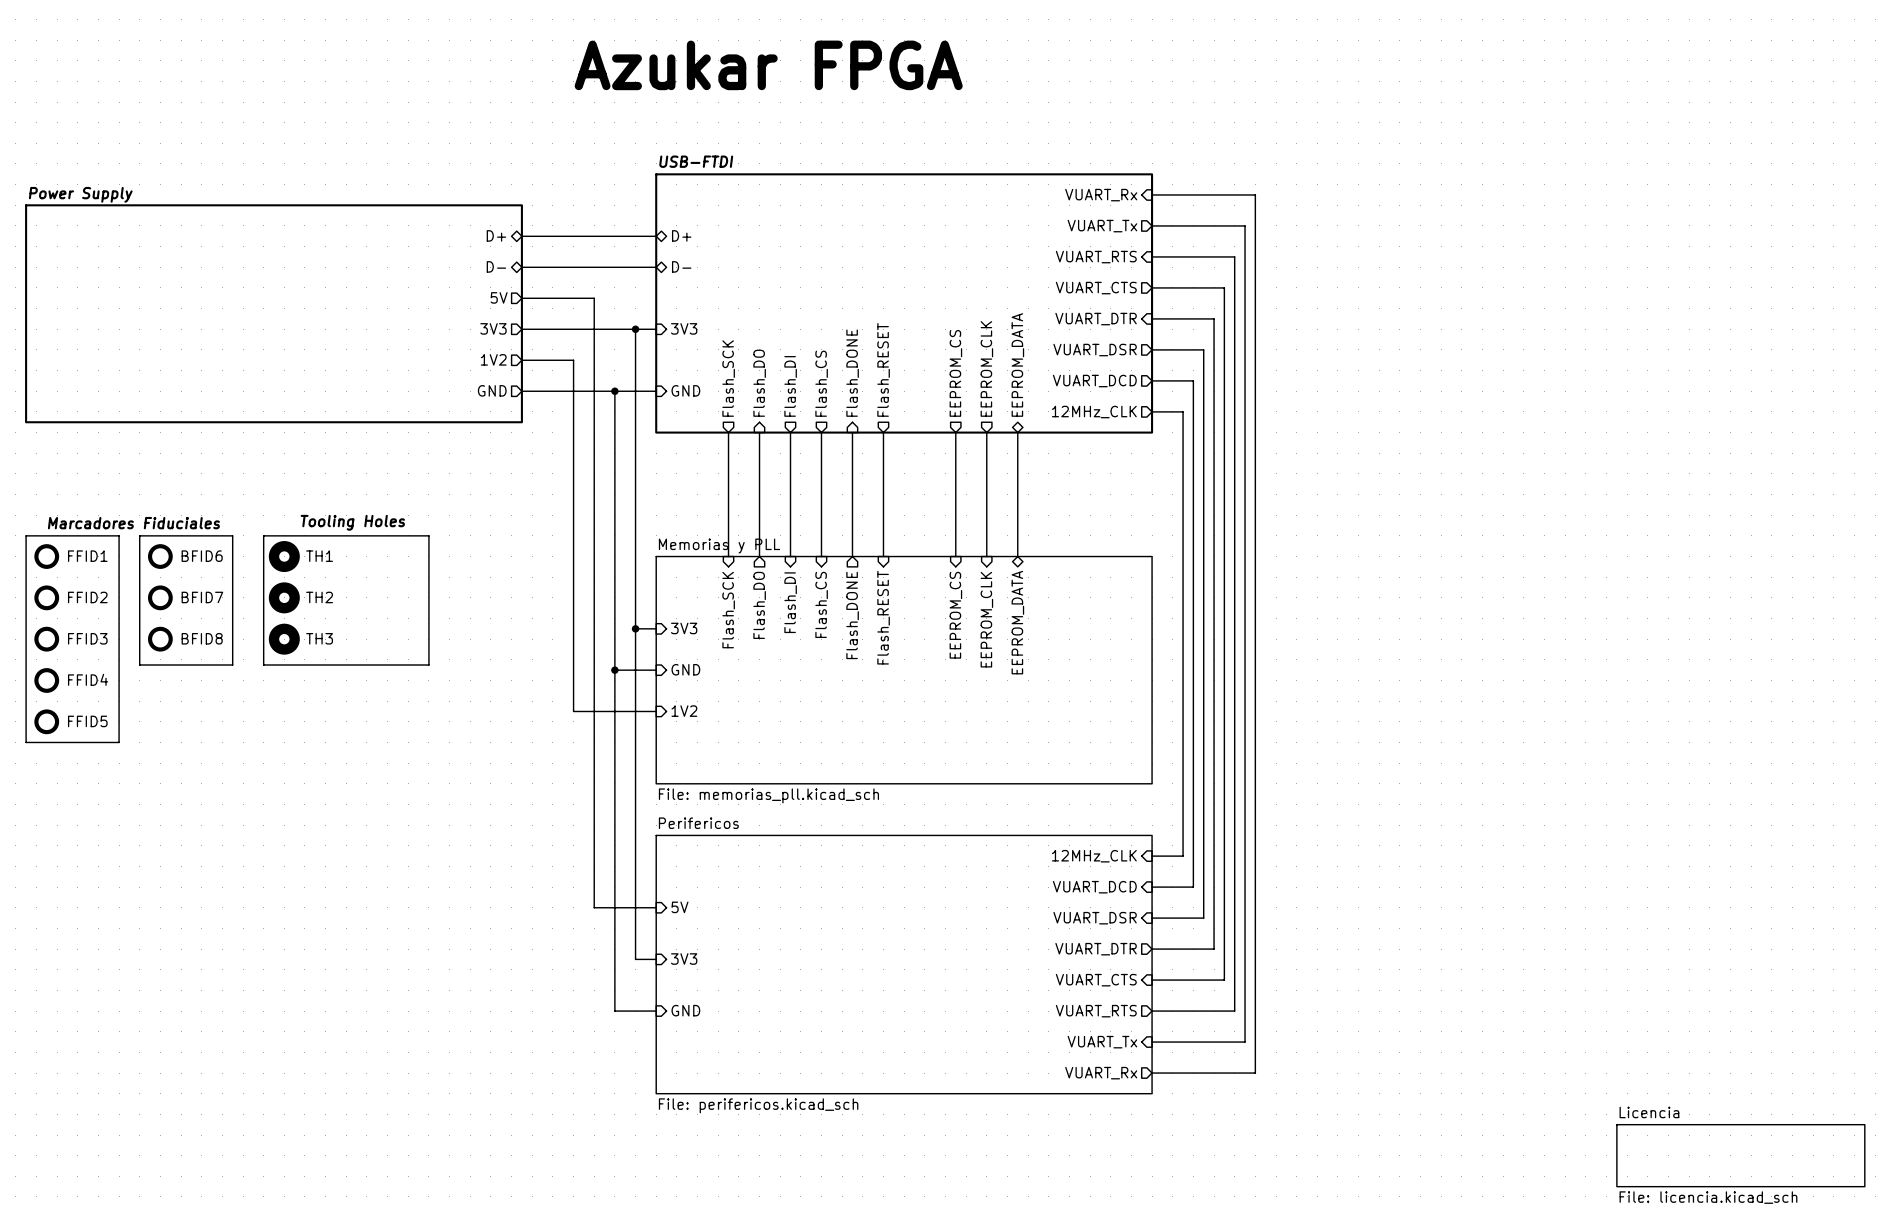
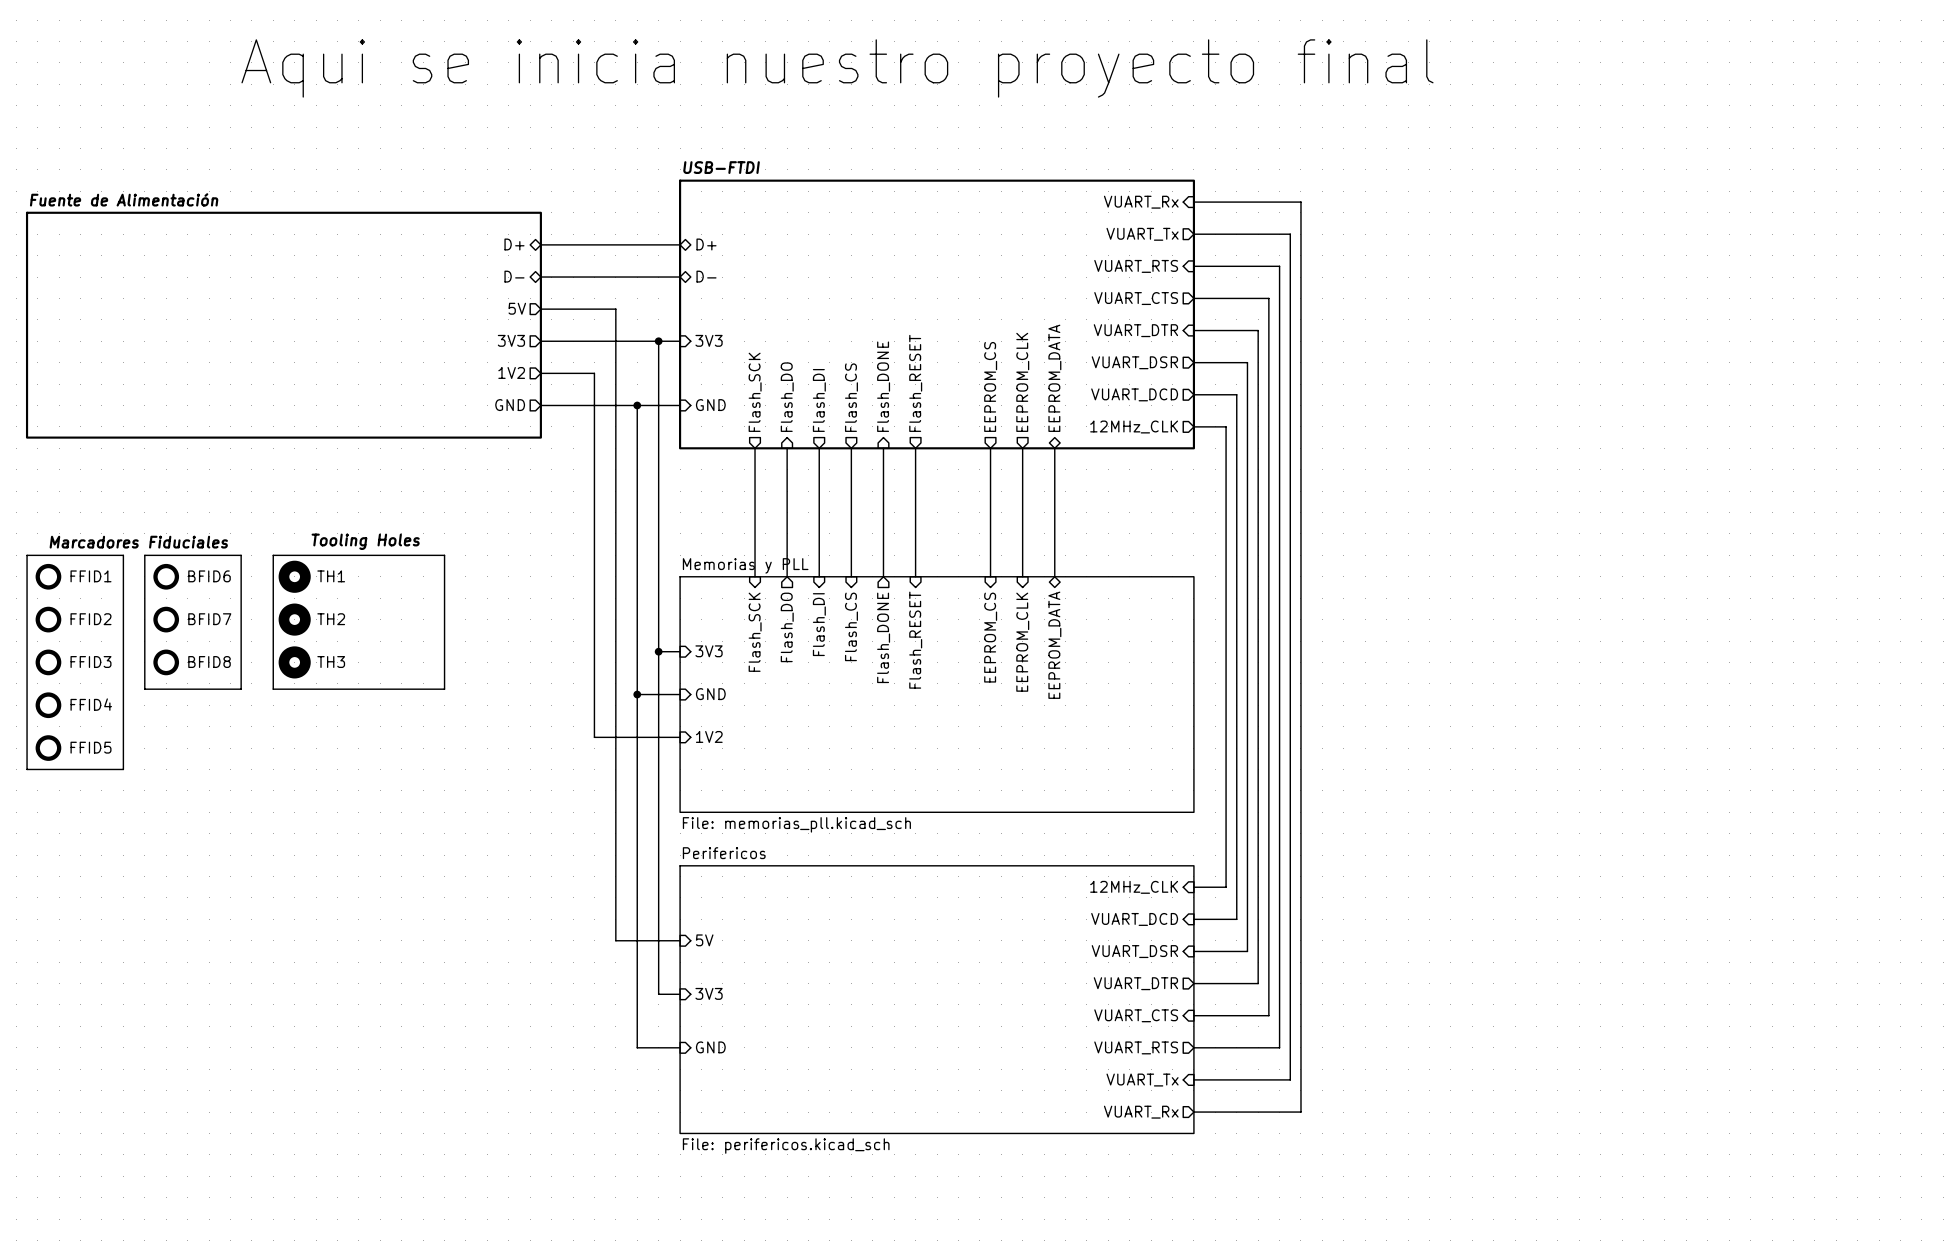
text: Azukar FPGA (768, 65) -> none
text: none -> Aqui se inicia nuestro proyecto final (837, 68)
sheet Power Supply name: Power Supply (80, 194) -> Fuente de Alimentación (124, 199)
sheet Licencia: File: licencia.kicad_sch (1740, 1155) -> none

